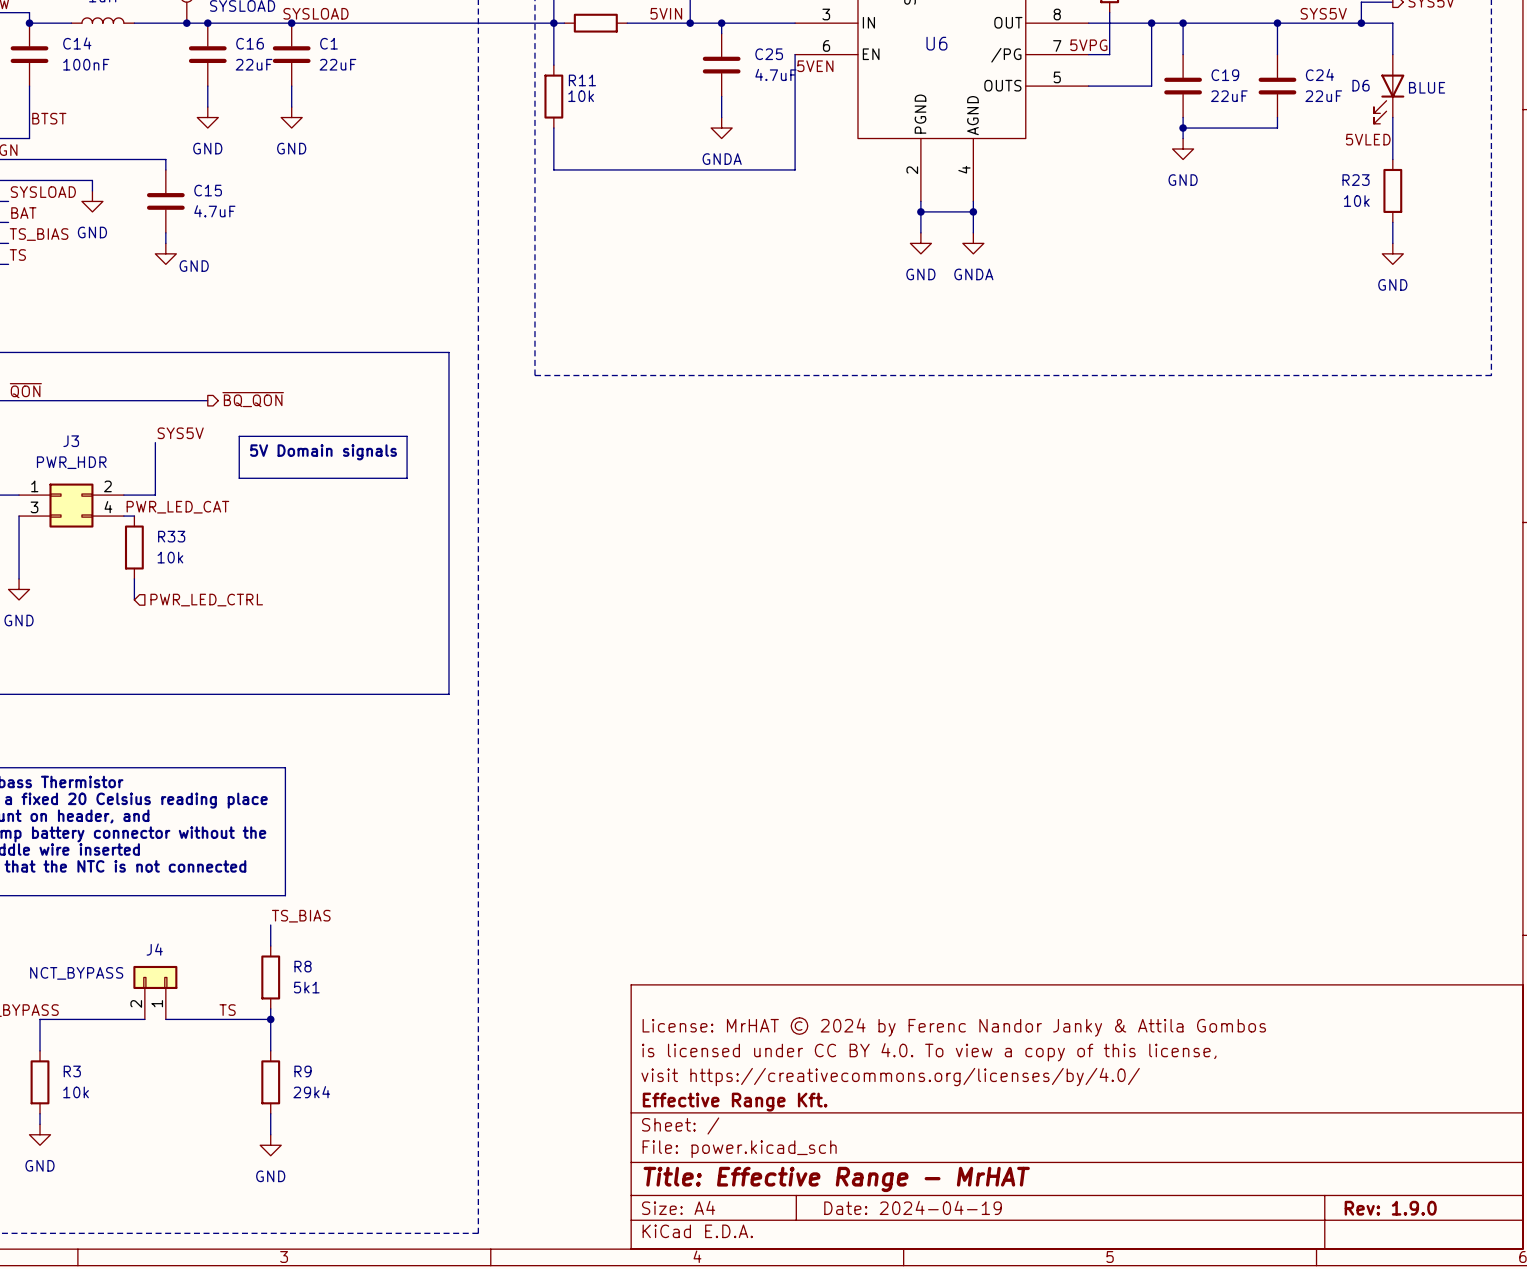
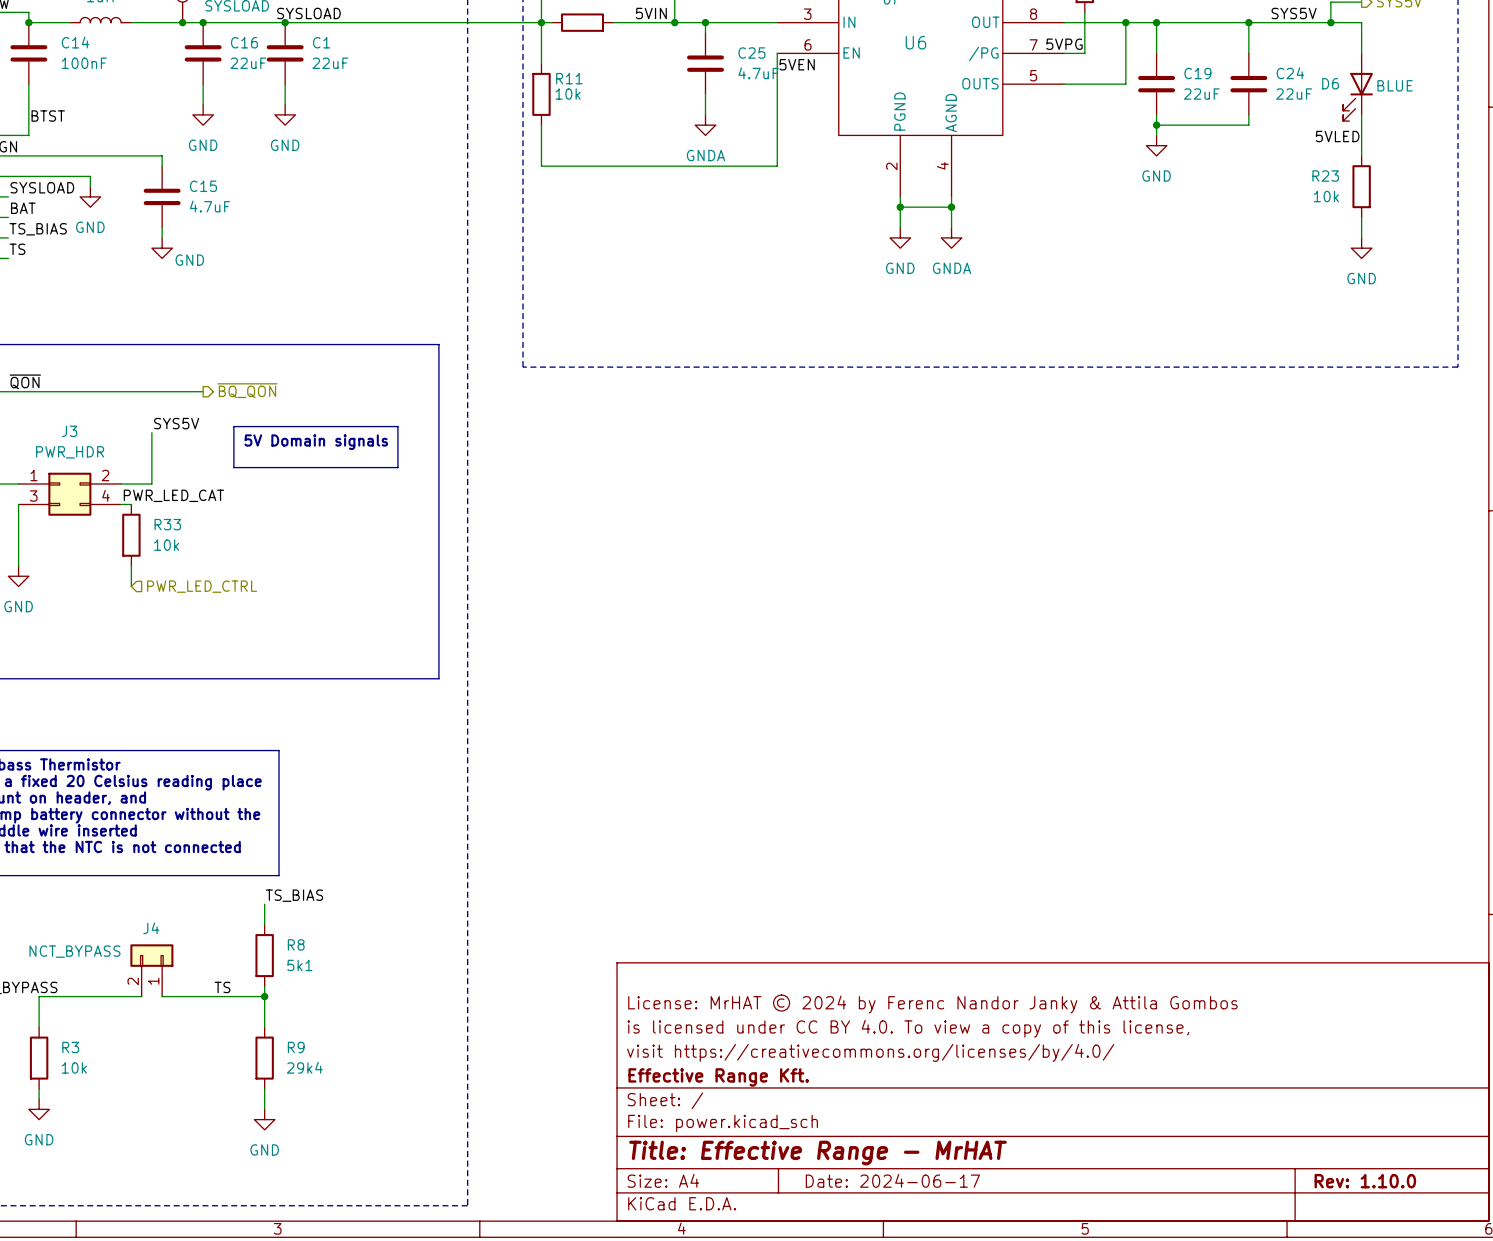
title block: Date: 2024-04-19 (913, 1207) -> Date: 2024-06-17 (892, 1180)
title block: Rev: 1.9.0 (1390, 1208) -> Rev: 1.10.0 (1365, 1181)

